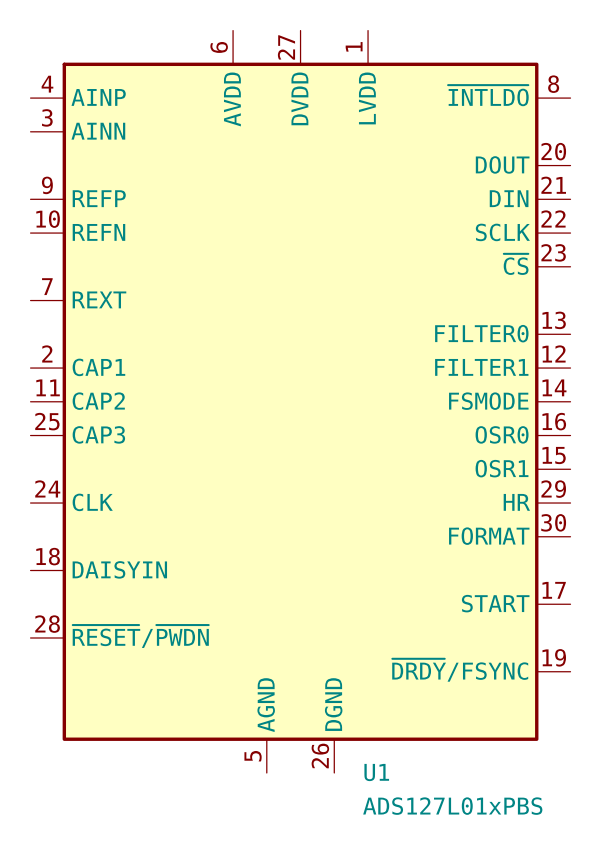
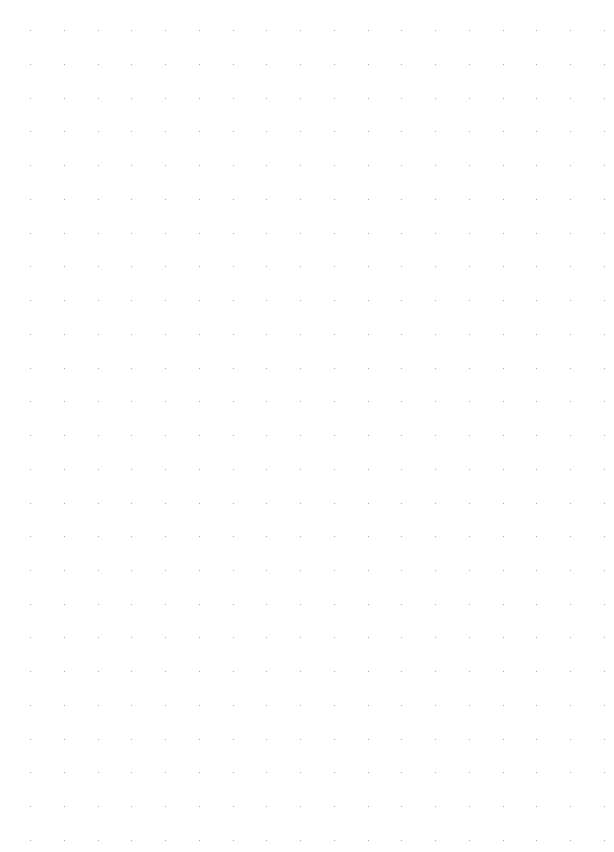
U1: ADS127L01xPBS (300, 401) -> none

